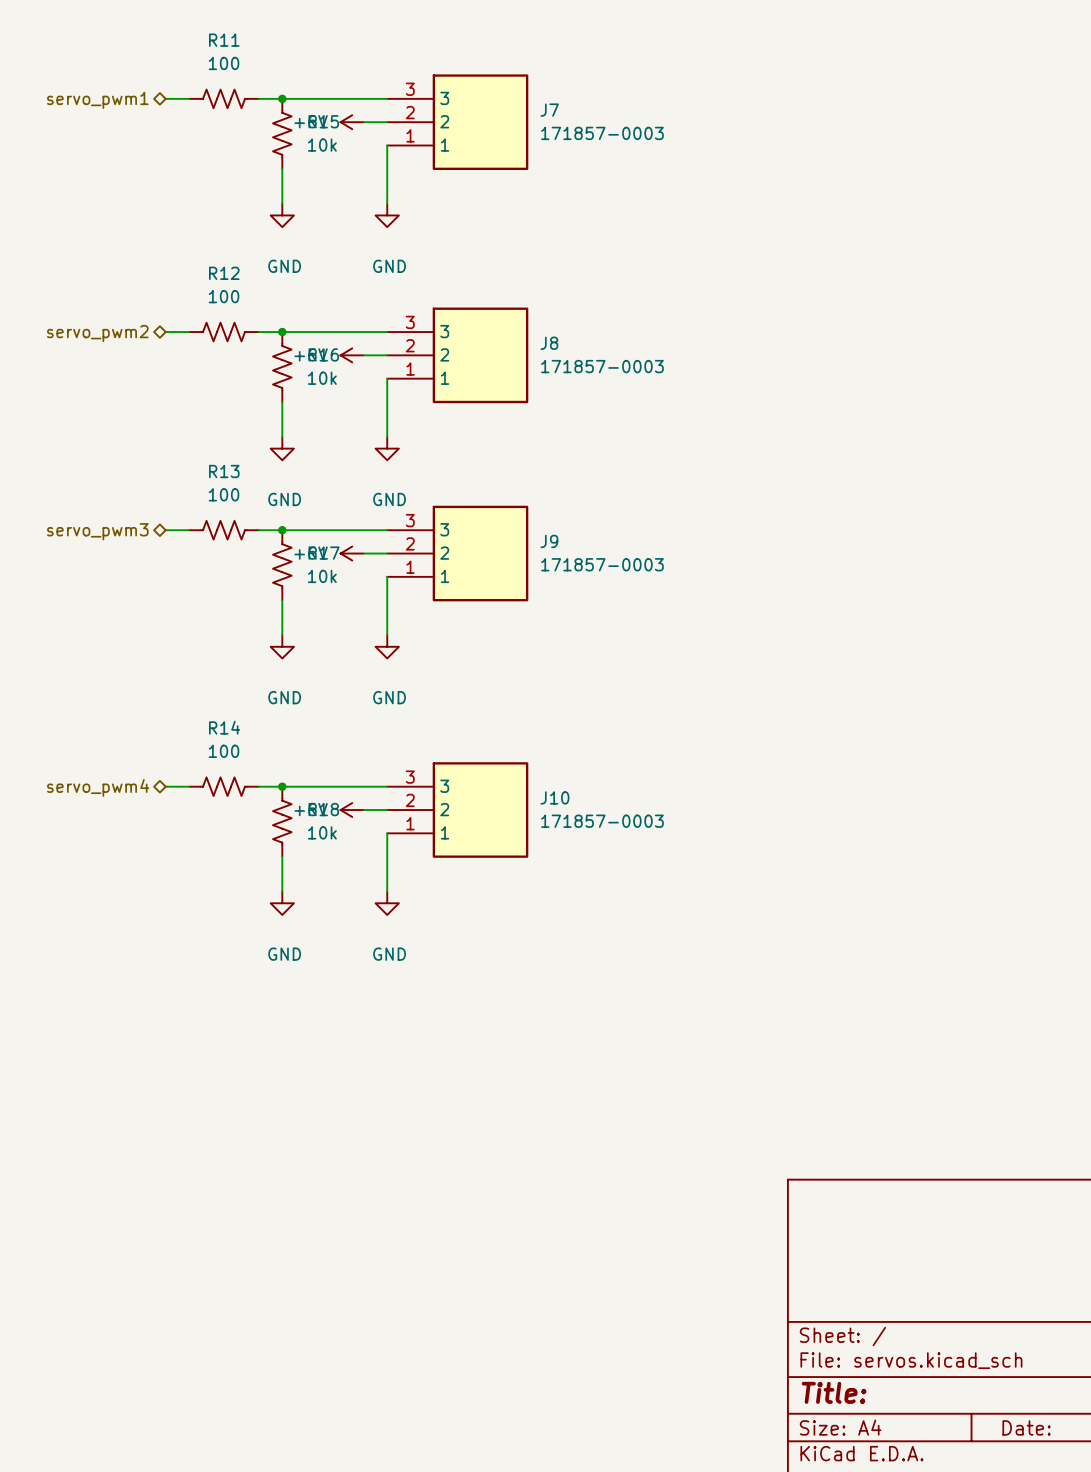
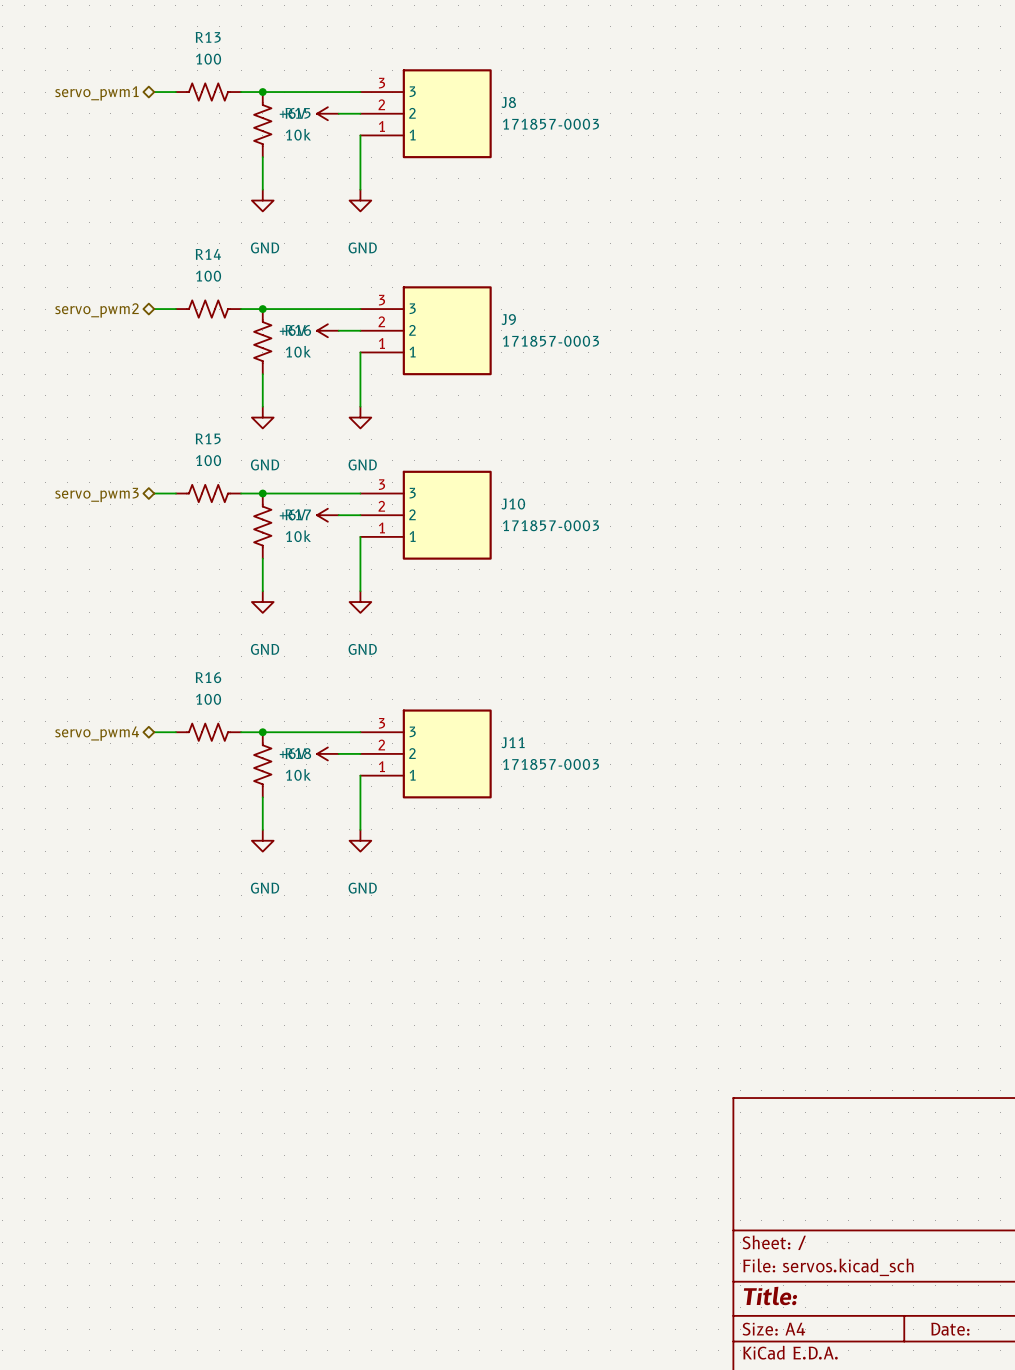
R11 name: R11 (224, 40) -> R13 (208, 37)
J7 name: J7 (549, 110) -> J8 (508, 102)
R12 name: R12 (224, 273) -> R14 (208, 254)
J8 name: J8 (549, 343) -> J9 (508, 319)
R13 name: R13 (224, 471) -> R15 (208, 438)
J9 name: J9 (549, 541) -> J10 (513, 504)
R14 name: R14 (224, 727) -> R16 (208, 677)
J10 name: J10 (554, 797) -> J11 (513, 742)

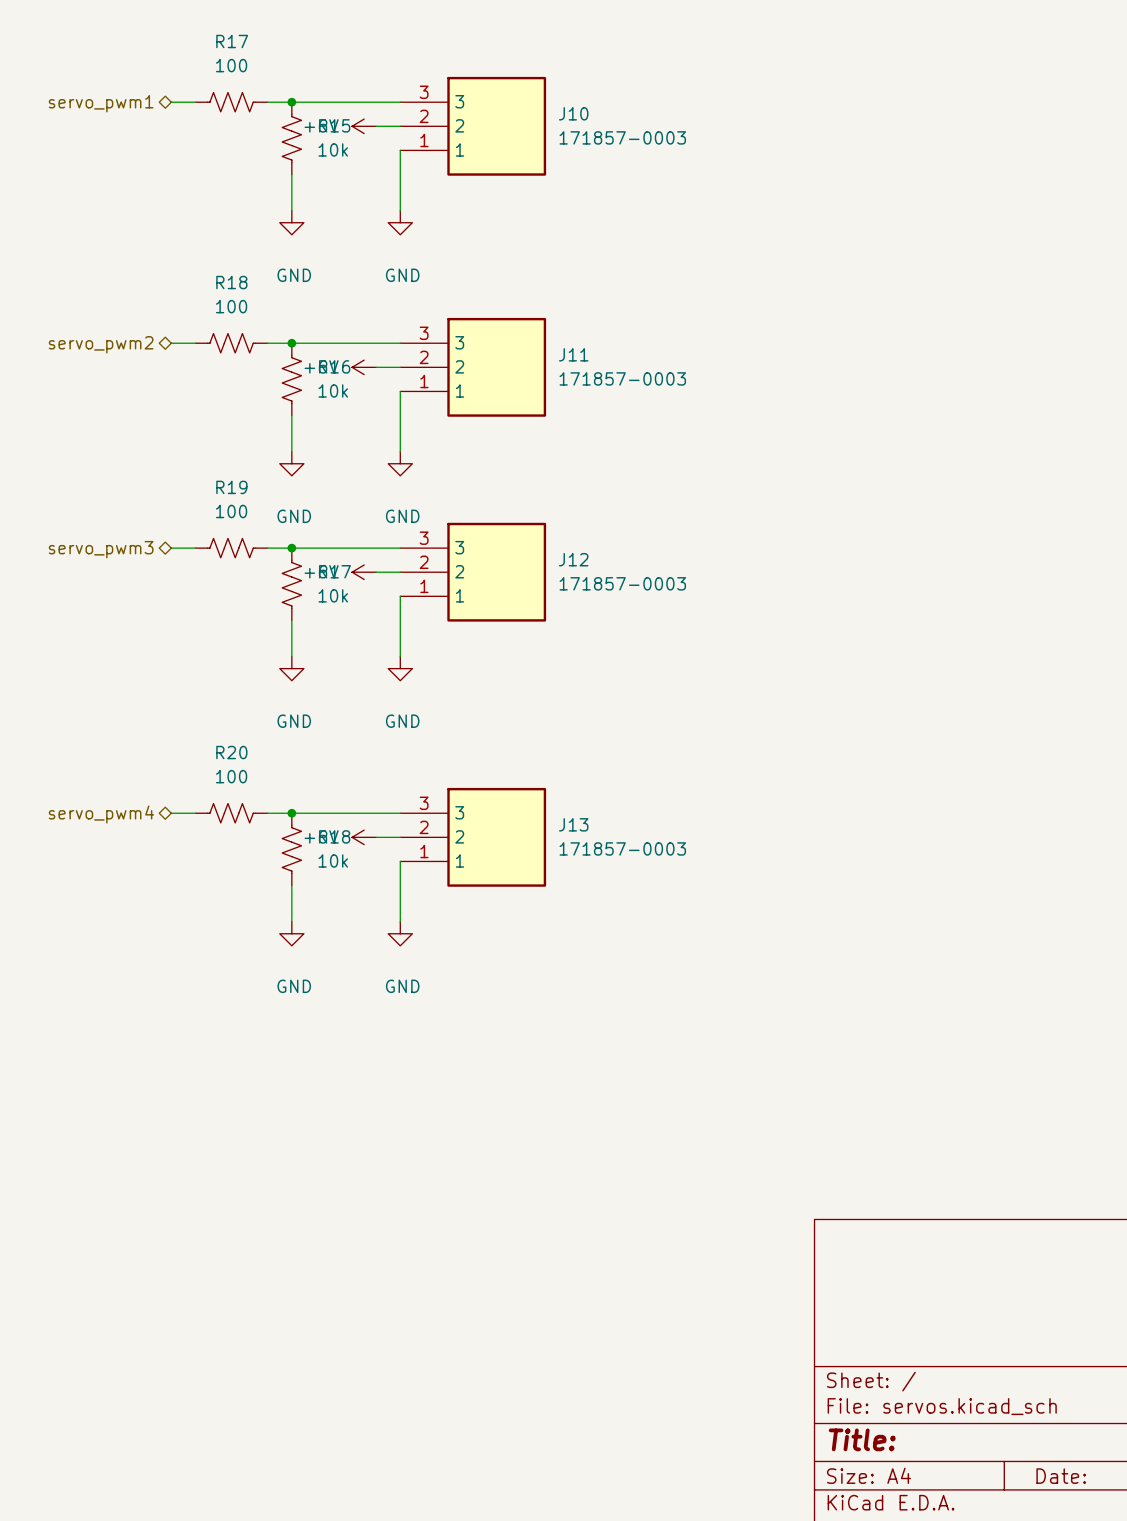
R13 name: R13 (208, 37) -> R17 (232, 41)
J8 name: J8 (508, 102) -> J10 (573, 113)
R14 name: R14 (208, 254) -> R18 (231, 282)
J9 name: J9 (508, 319) -> J11 (573, 354)
R15 name: R15 (208, 438) -> R19 (231, 487)
J10 name: J10 (513, 504) -> J12 (573, 559)
R16 name: R16 (208, 677) -> R20 (231, 752)
J11 name: J11 (513, 742) -> J13 (573, 824)

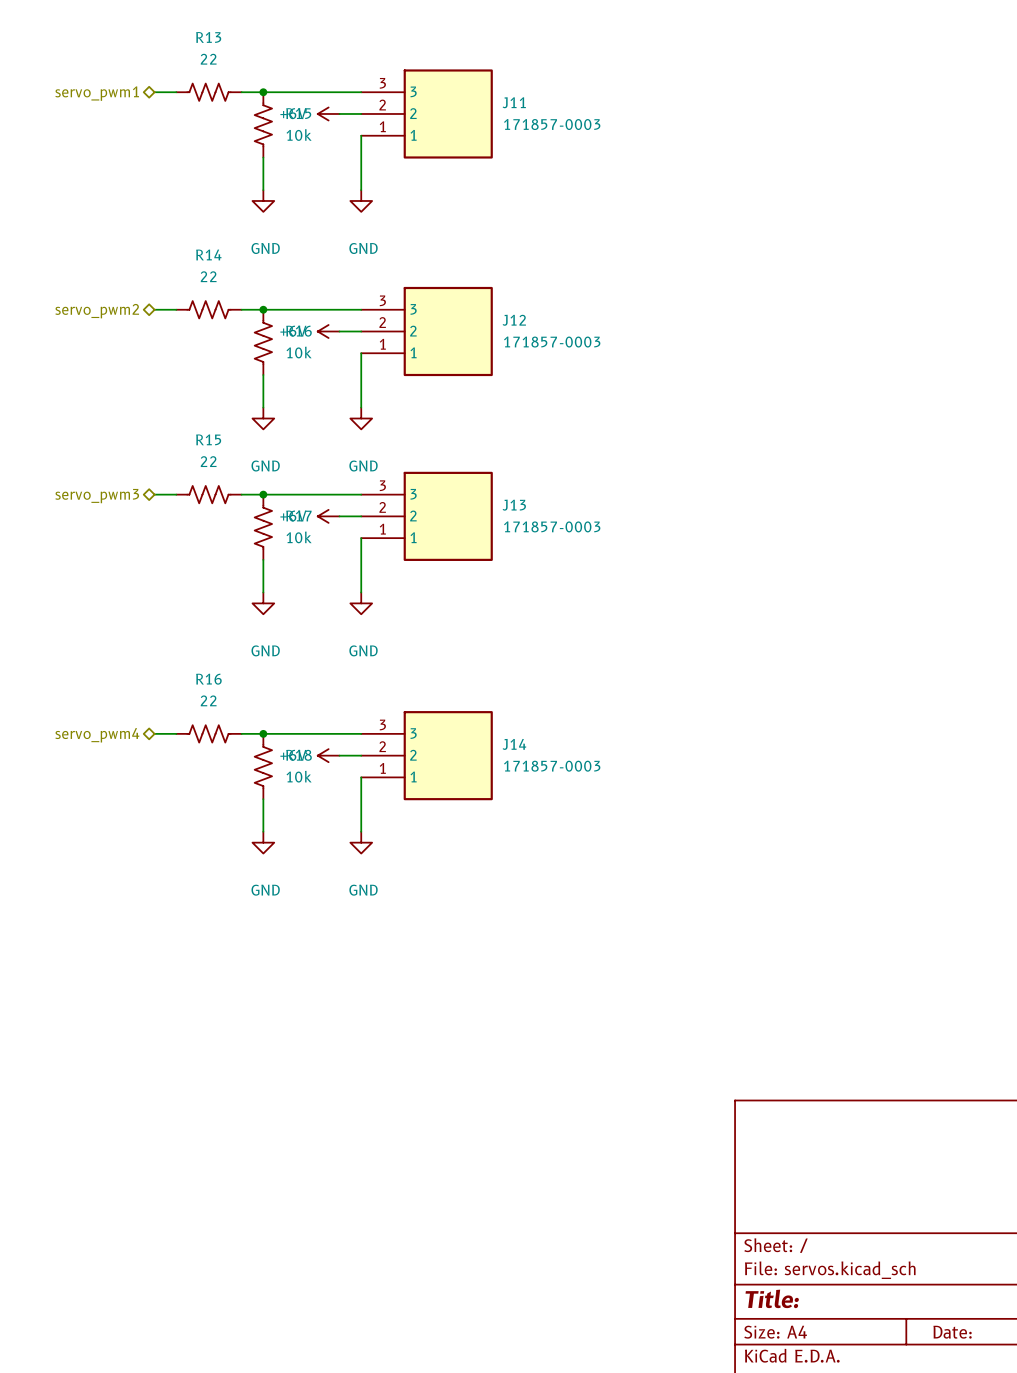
R17 name: R17 (232, 41) -> R13 (208, 37)
R17 value: 100 (231, 65) -> 22 (208, 59)
J10 name: J10 (573, 113) -> J11 (514, 102)
R18 name: R18 (231, 282) -> R14 (208, 254)
R18 value: 100 (231, 306) -> 22 (208, 276)
J11 name: J11 (573, 354) -> J12 (514, 320)
R19 name: R19 (231, 487) -> R15 (208, 439)
R19 value: 100 (231, 511) -> 22 (208, 461)
J12 name: J12 (573, 559) -> J13 (514, 505)
R20 name: R20 (231, 752) -> R16 (208, 679)
R20 value: 100 (231, 776) -> 22 (208, 700)
J13 name: J13 (573, 824) -> J14 (514, 744)

